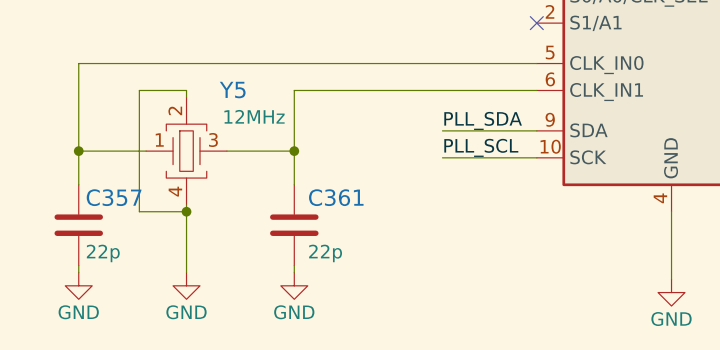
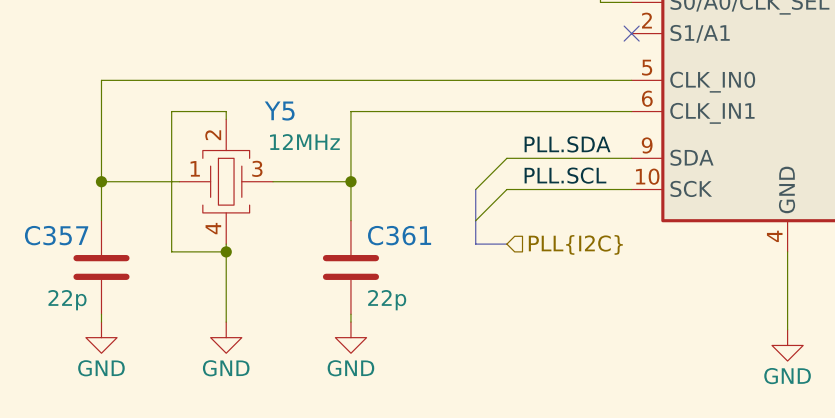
label: PLL_SDA (483, 120) -> PLL.SDA (567, 144)
wire: none -> (522, 158) (506, 158) (475, 189)
label: PLL_SCL (481, 147) -> PLL.SCL (565, 175)
bus: none -> (475, 189) (475, 244) (506, 244)
wire: none -> (522, 189) (506, 189) (475, 220)
C357 name position: C357 (114, 197) -> C357 (56, 235)
hierarchical label: none -> PLL{I2C} (575, 244)
C357 text position: 22p (103, 253) -> 22p (67, 300)

